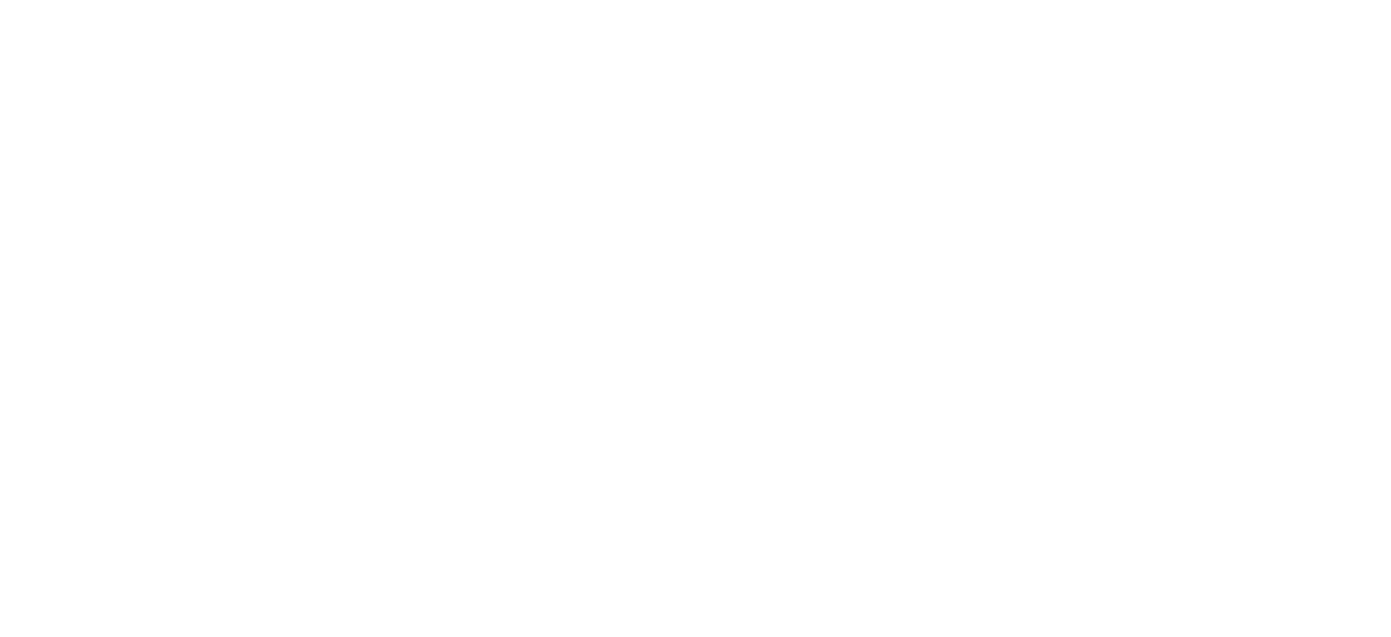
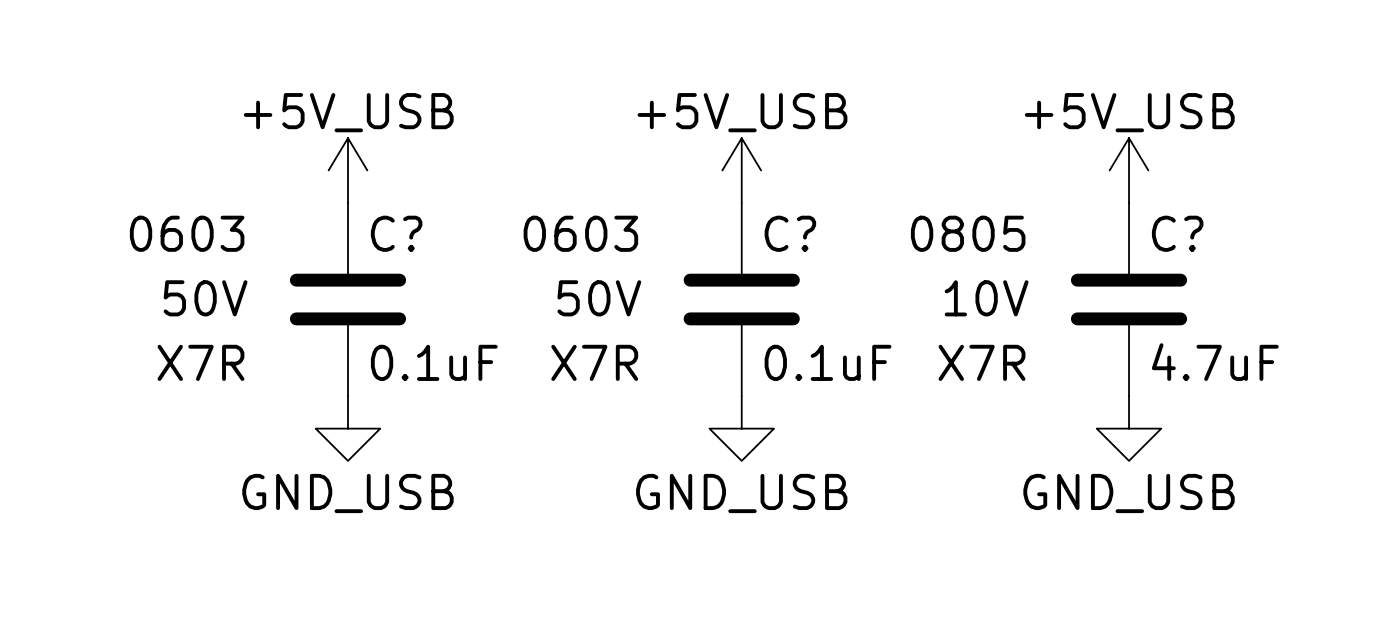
power symbol: none -> +5V_USB (347, 170)
power symbol: none -> +5V_USB (741, 170)
power symbol: none -> +5V_USB (1129, 170)
C?: none -> 0.1uF (347, 299)
C?: none -> 0.1uF (741, 299)
C?: none -> 4.7uF (1129, 299)
power symbol: none -> GND_USB (347, 428)
power symbol: none -> GND_USB (741, 428)
power symbol: none -> GND_USB (1129, 428)

